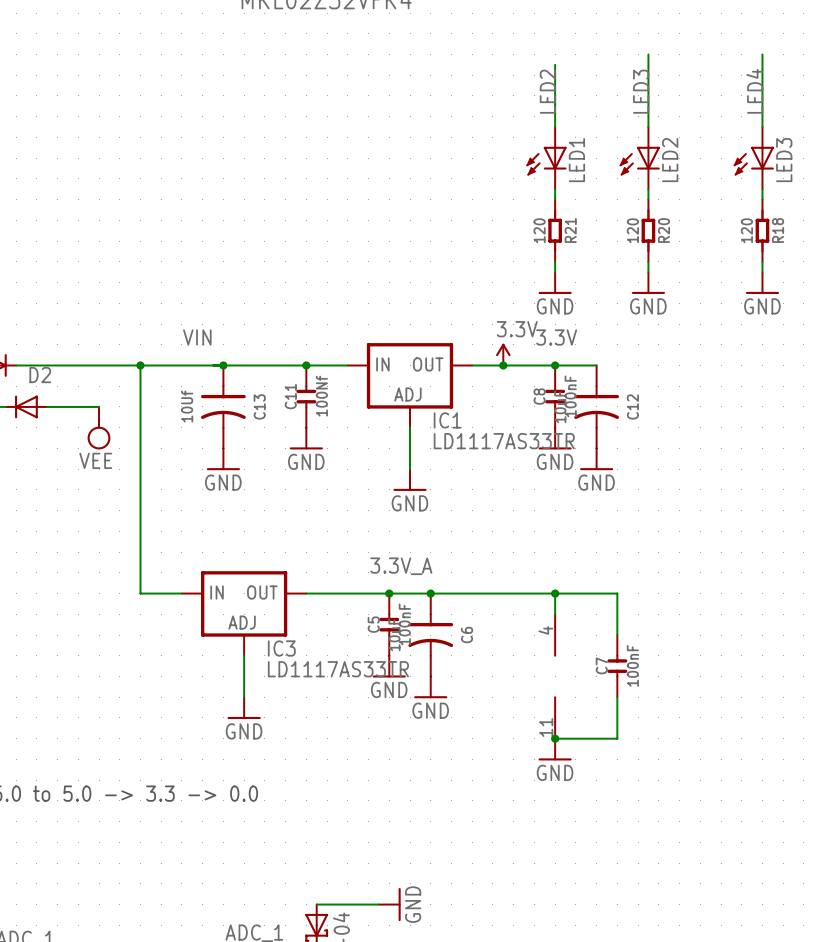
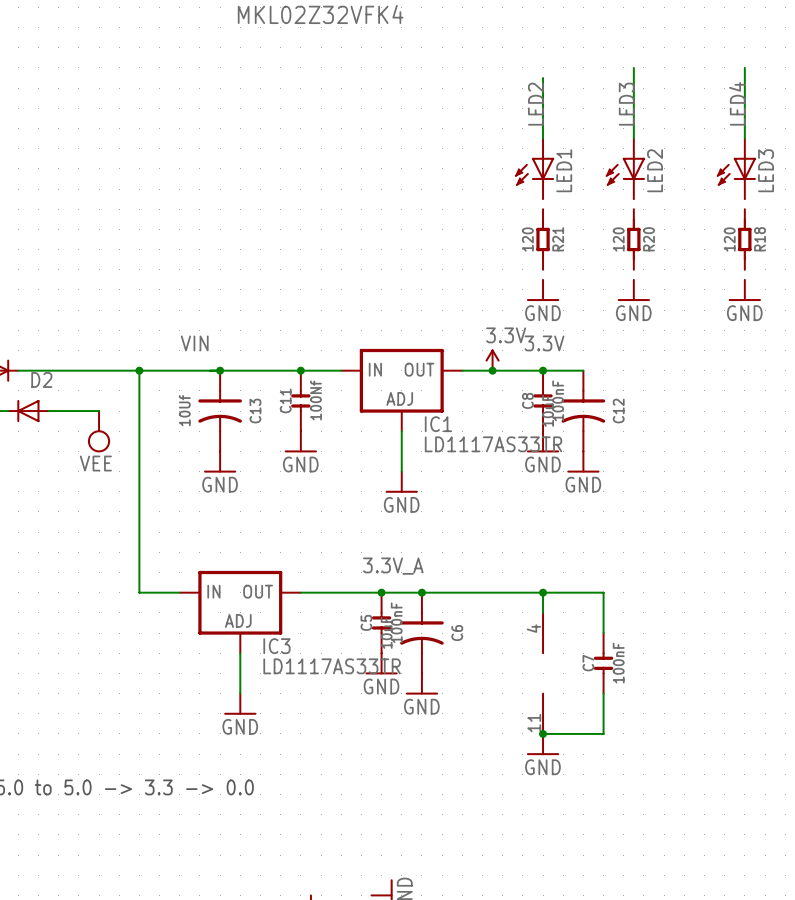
wire: (555, 189) (555, 199) -> none
wire: (648, 189) (648, 199) -> none
wire: (762, 189) (762, 199) -> none
wire: (555, 261) (555, 272) -> none
wire: (648, 261) (648, 272) -> none
wire: (762, 261) (762, 272) -> none
wire: (316, 904) (378, 904) -> none

